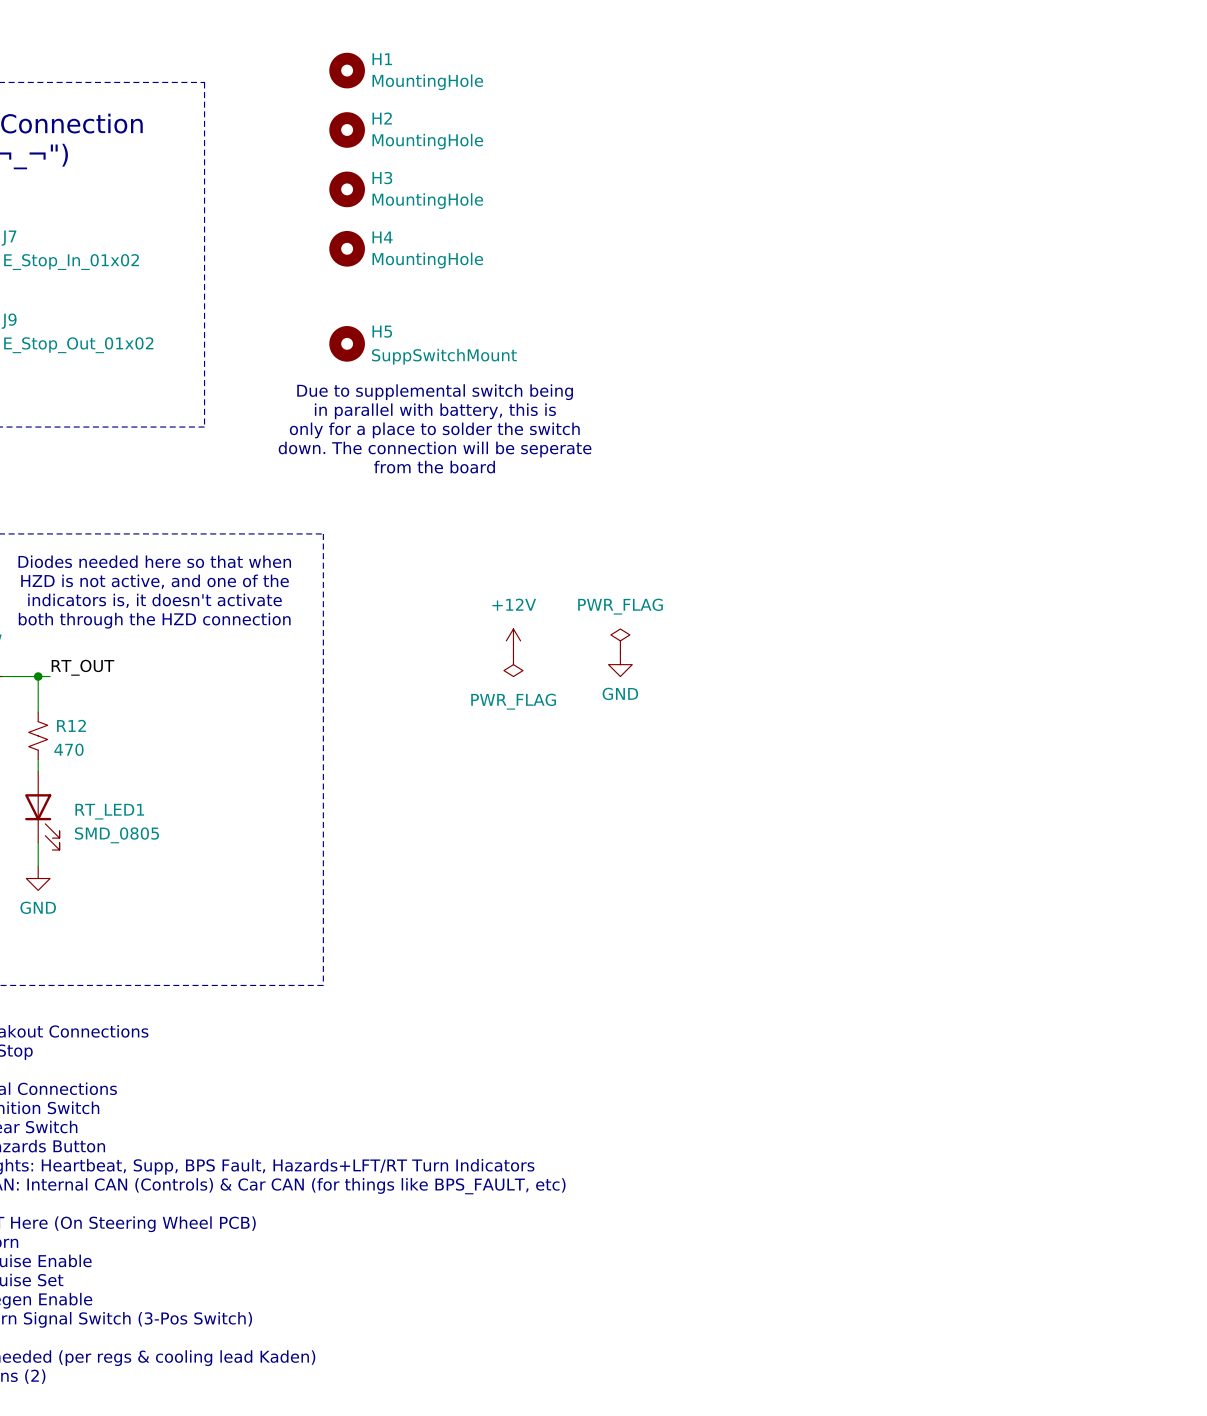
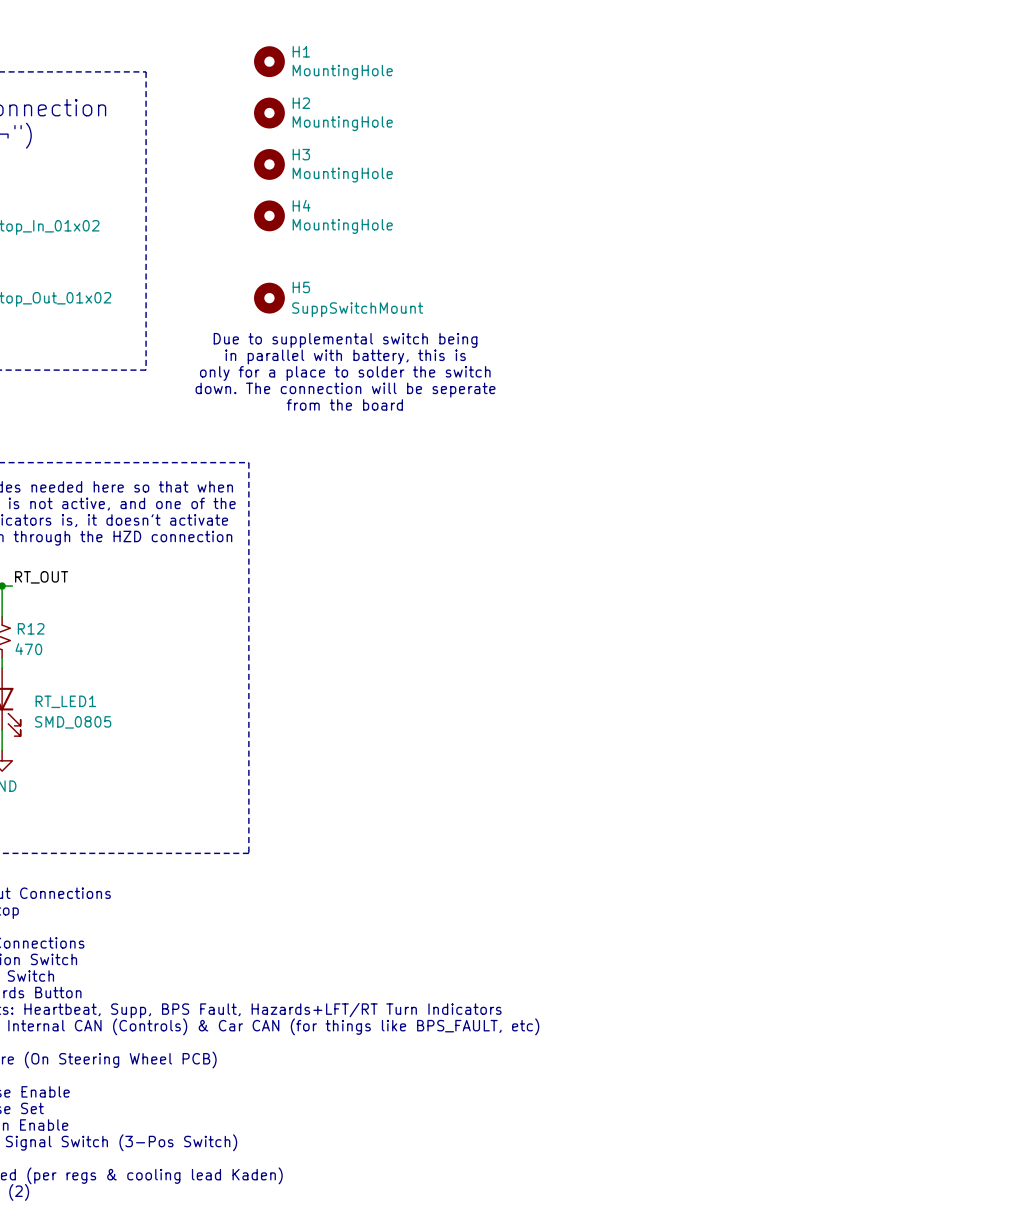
power symbol: +12V (513, 640) -> none
power symbol: PWR_FLAG (620, 640) -> none
power symbol: PWR_FLAG (513, 664) -> none
power symbol: GND (620, 664) -> none

